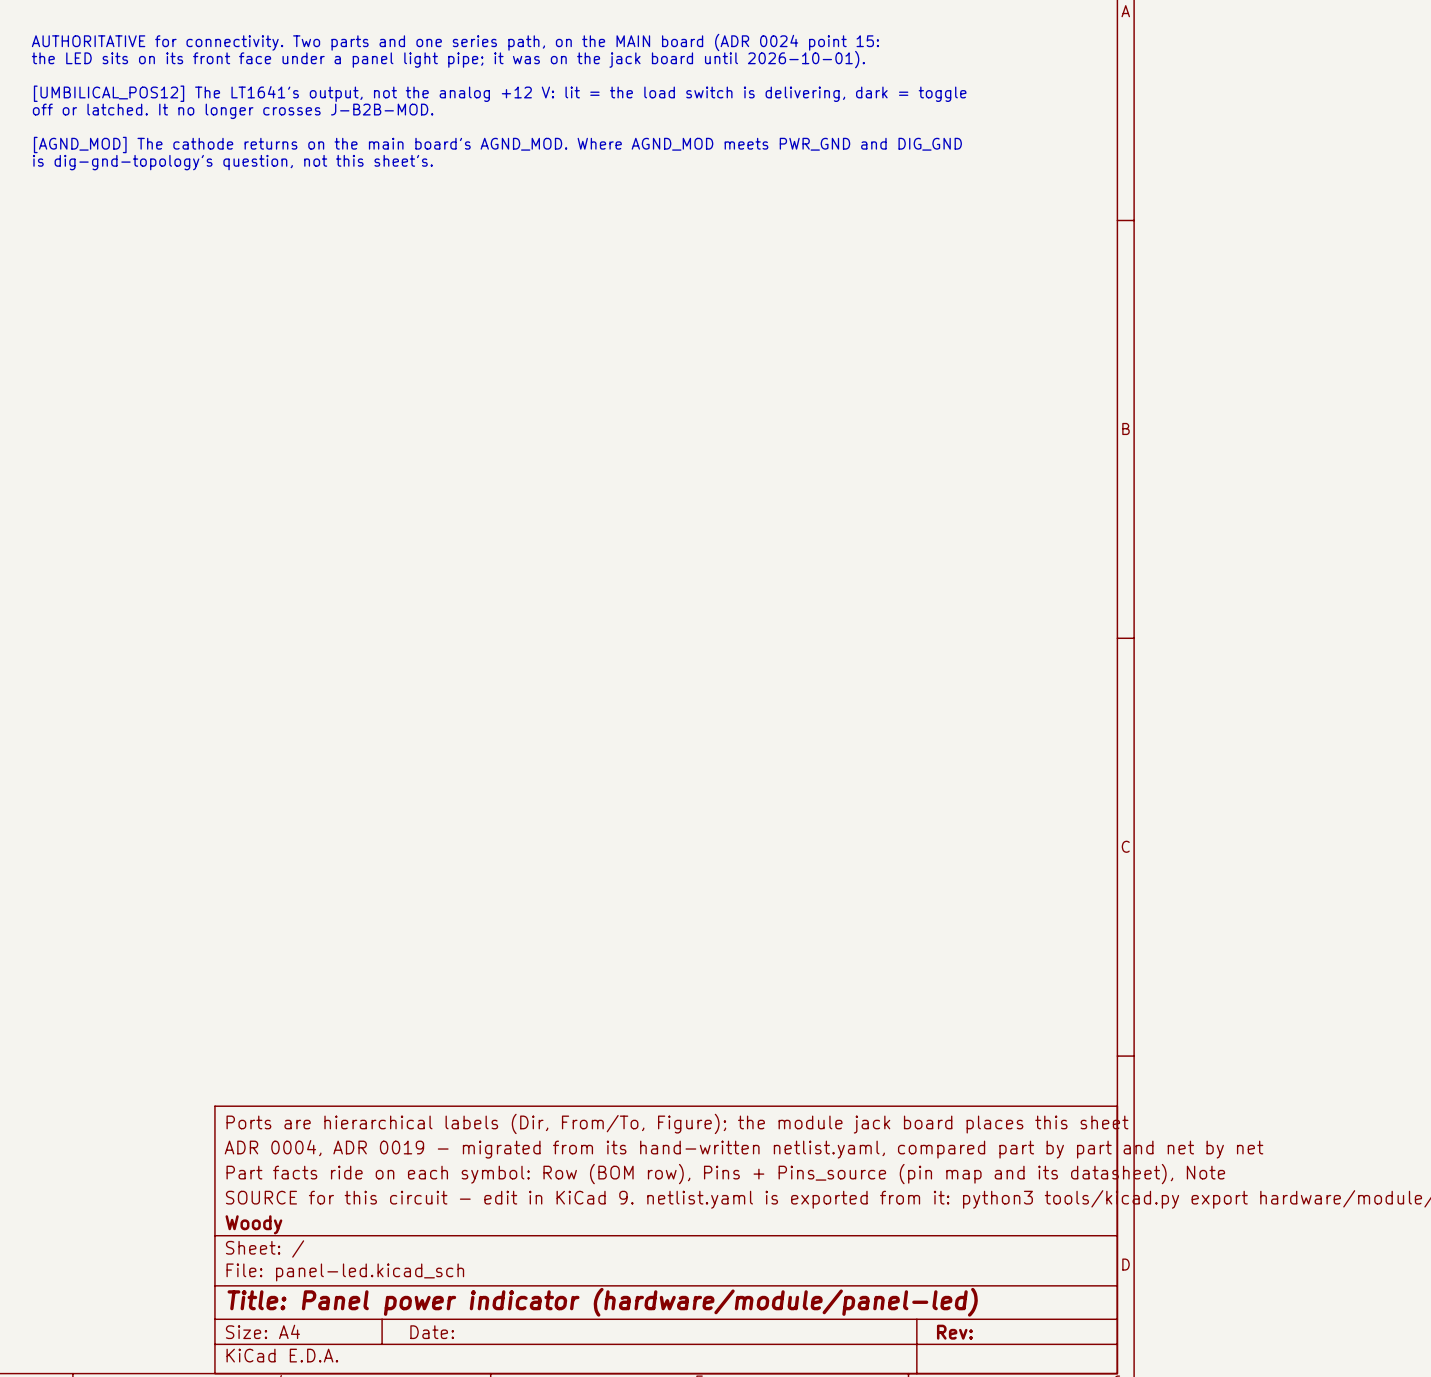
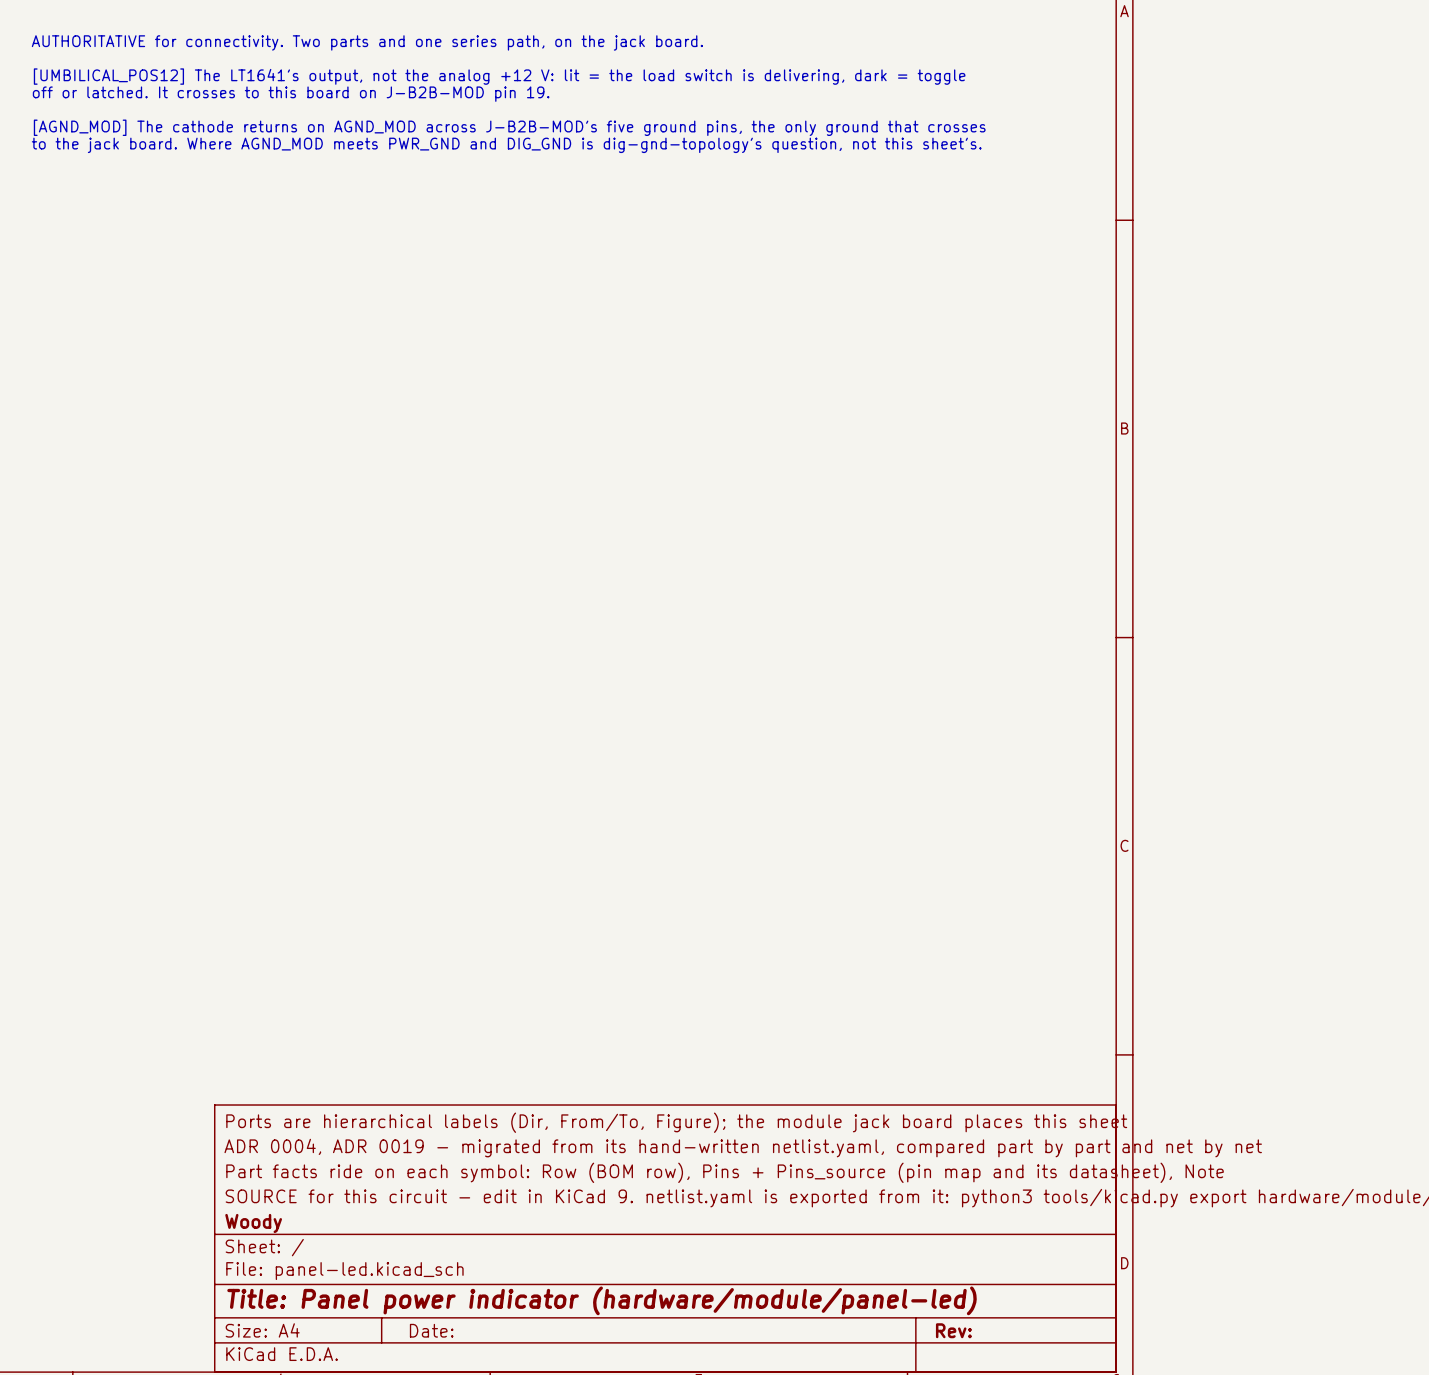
text: AUTHORITATIVE for connectivity. Two parts and one series path, on the MAIN board (ADR 0024 point 15: (455, 42) -> AUTHORITATIVE for connectivity. Two parts and one series path, on the jack board. (367, 42)
text: the LED sits on its front face under a panel light pipe; it was on the jack board until 2026-10-01). (448, 59) -> none
text: none -> [UMBILICAL_POS12] The LT1641's output, not the analog +12 V: lit = the load switch is delivering, dark = toggle (499, 76)
text: [UMBILICAL_POS12] The LT1641's output, not the analog +12 V: lit = the load switch is delivering, dark = toggle (500, 93) -> off or latched. It crosses to this board on J-B2B-MOD pin 19. (291, 94)
text: off or latched. It no longer crosses J-B2B-MOD. (233, 111) -> none
text: none -> [AGND_MOD] The cathode returns on AGND_MOD across J-B2B-MOD's five ground pins, the only ground that crosses (509, 127)
text: [AGND_MOD] The cathode returns on the main board's AGND_MOD. Where AGND_MOD meets PWR_GND and DIG_GND (497, 144) -> to the jack board. Where AGND_MOD meets PWR_GND and DIG_GND is dig-gnd-topology's question, not this sheet's. (506, 145)
text: is dig-gnd-topology's question, not this sheet's. (232, 162) -> none

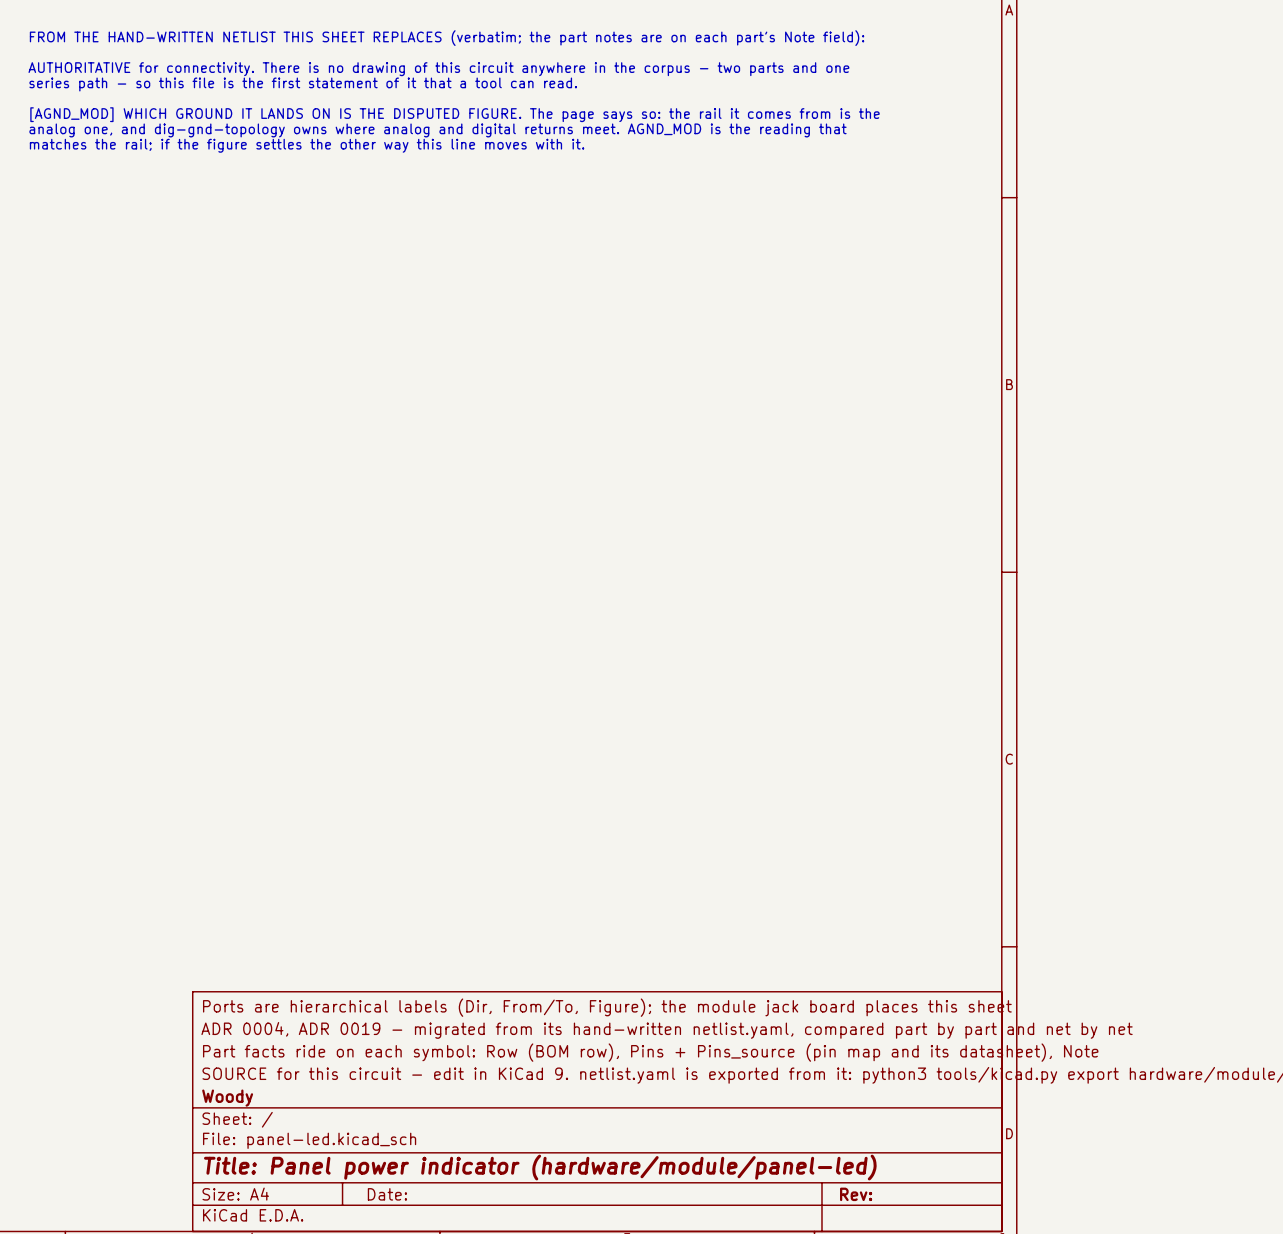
text: AUTHORITATIVE for connectivity. Two parts and one series path, on the jack board. (367, 42) -> FROM THE HAND-WRITTEN NETLIST THIS SHEET REPLACES (verbatim; the part notes are on each part's Note field): (447, 38)
text: [UMBILICAL_POS12] The LT1641's output, not the analog +12 V: lit = the load switch is delivering, dark = toggle (499, 76) -> AUTHORITATIVE for connectivity. There is no drawing of this circuit anywhere in the corpus - two parts and one (438, 69)
text: off or latched. It crosses to this board on J-B2B-MOD pin 19. (291, 94) -> series path - so this file is the first statement of it that a tool can read. (303, 84)
text: [AGND_MOD] The cathode returns on AGND_MOD across J-B2B-MOD's five ground pins, the only ground that crosses (509, 127) -> [AGND_MOD] WHICH GROUND IT LANDS ON IS THE DISPUTED FIGURE. The page says so: the rail it comes from is the (454, 114)
text: to the jack board. Where AGND_MOD meets PWR_GND and DIG_GND is dig-gnd-topology's question, not this sheet's. (506, 145) -> analog one, and dig-gnd-topology owns where analog and digital returns meet. AGND_MOD is the reading that (437, 130)
text: none -> matches the rail; if the figure settles the other way this line moves with it. (307, 145)

